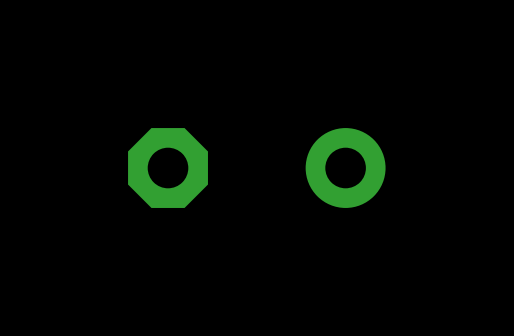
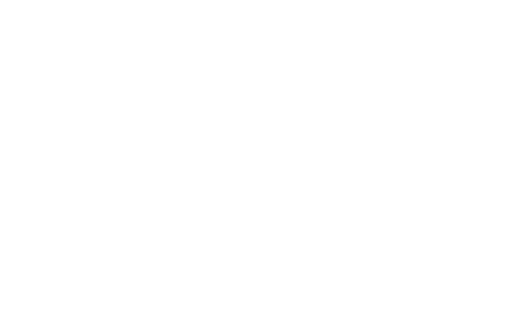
part: (256, 168) -> none

